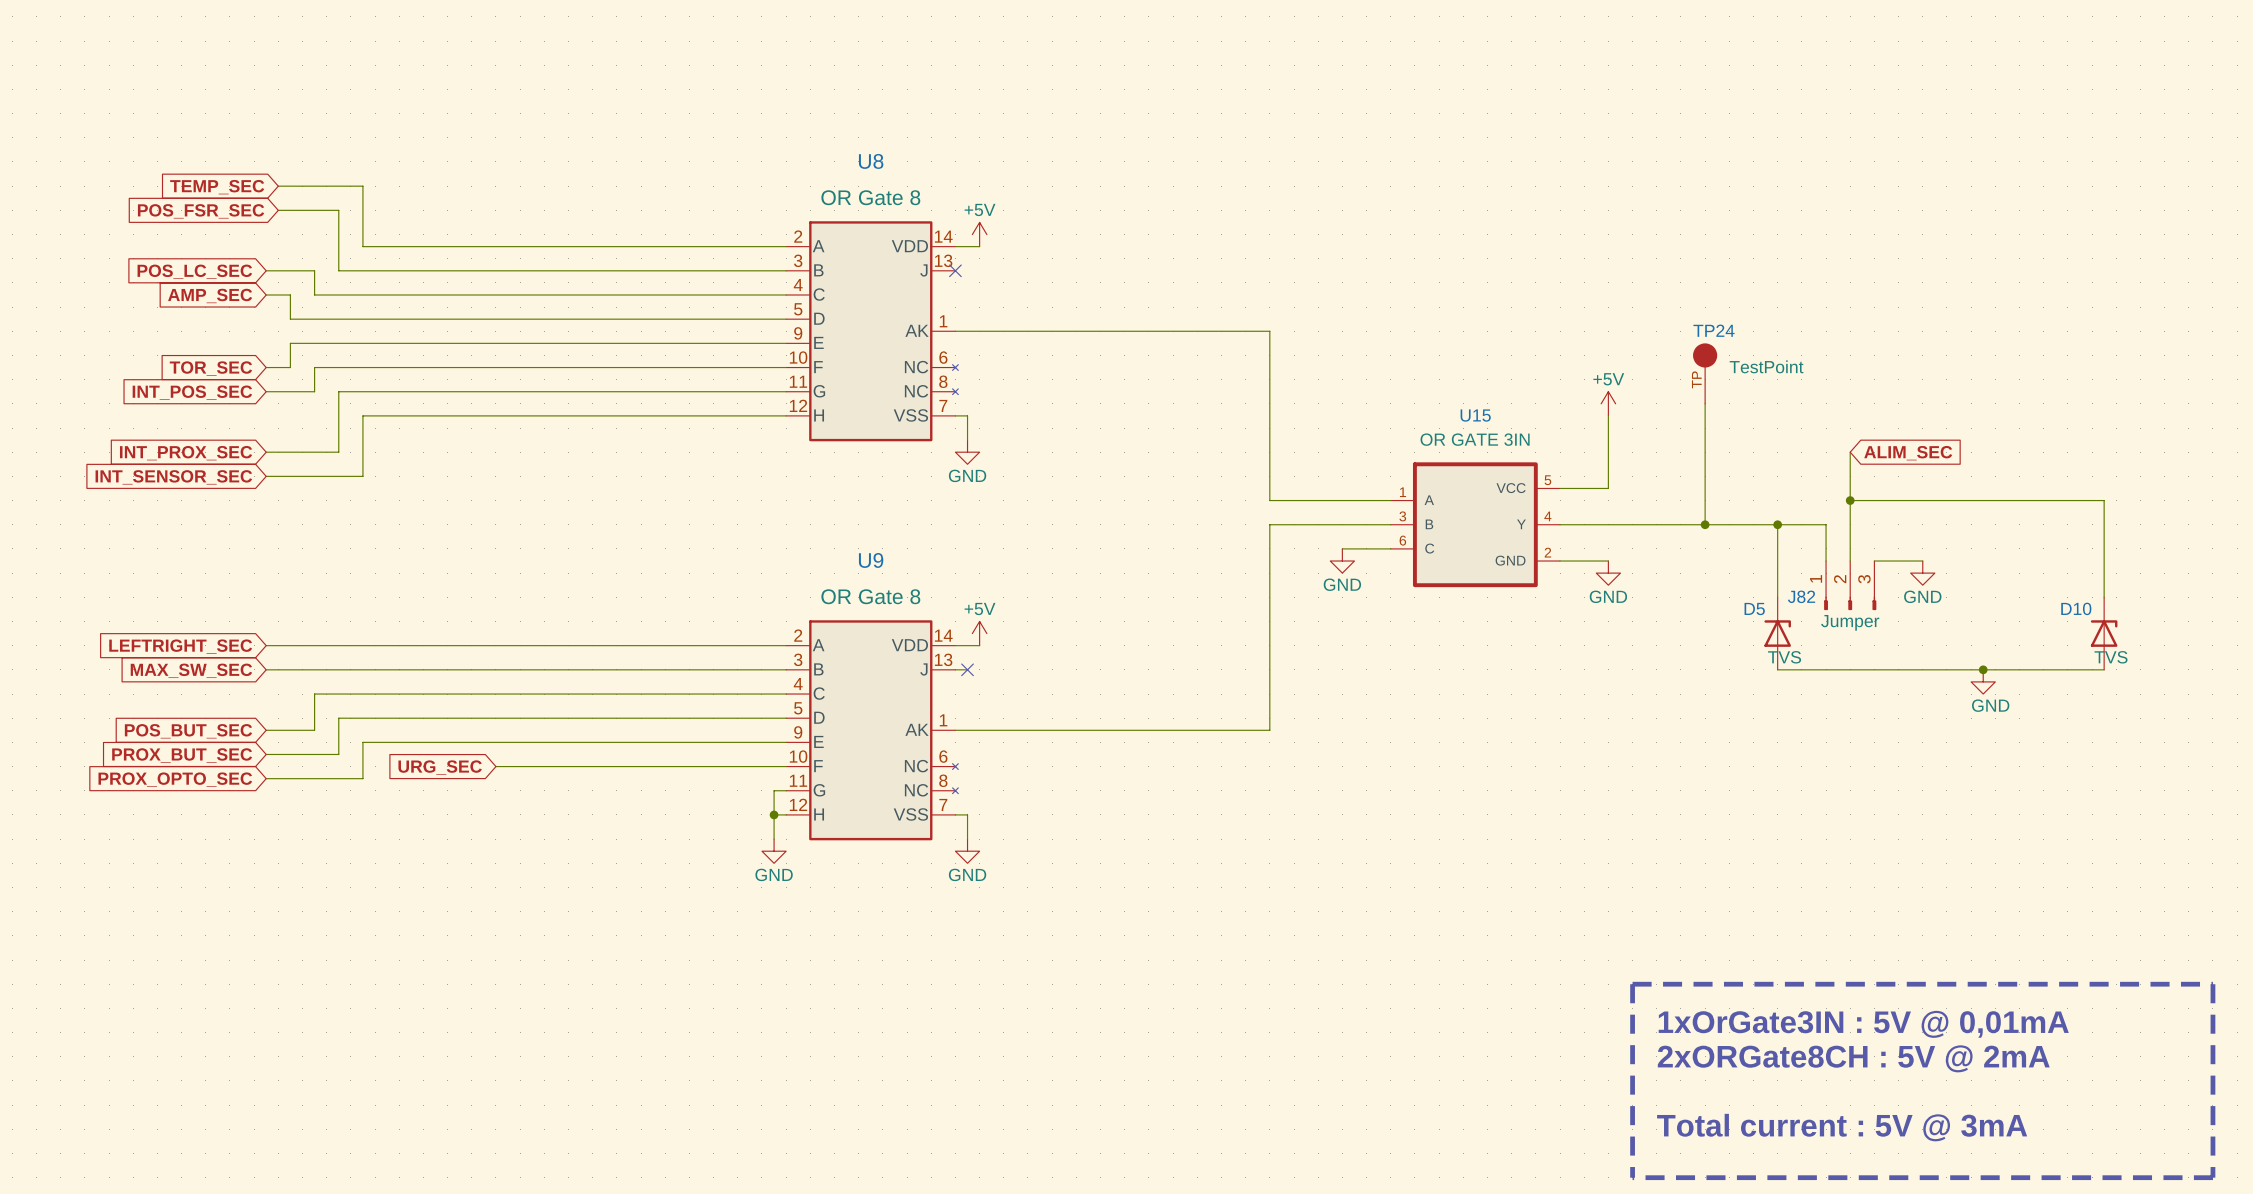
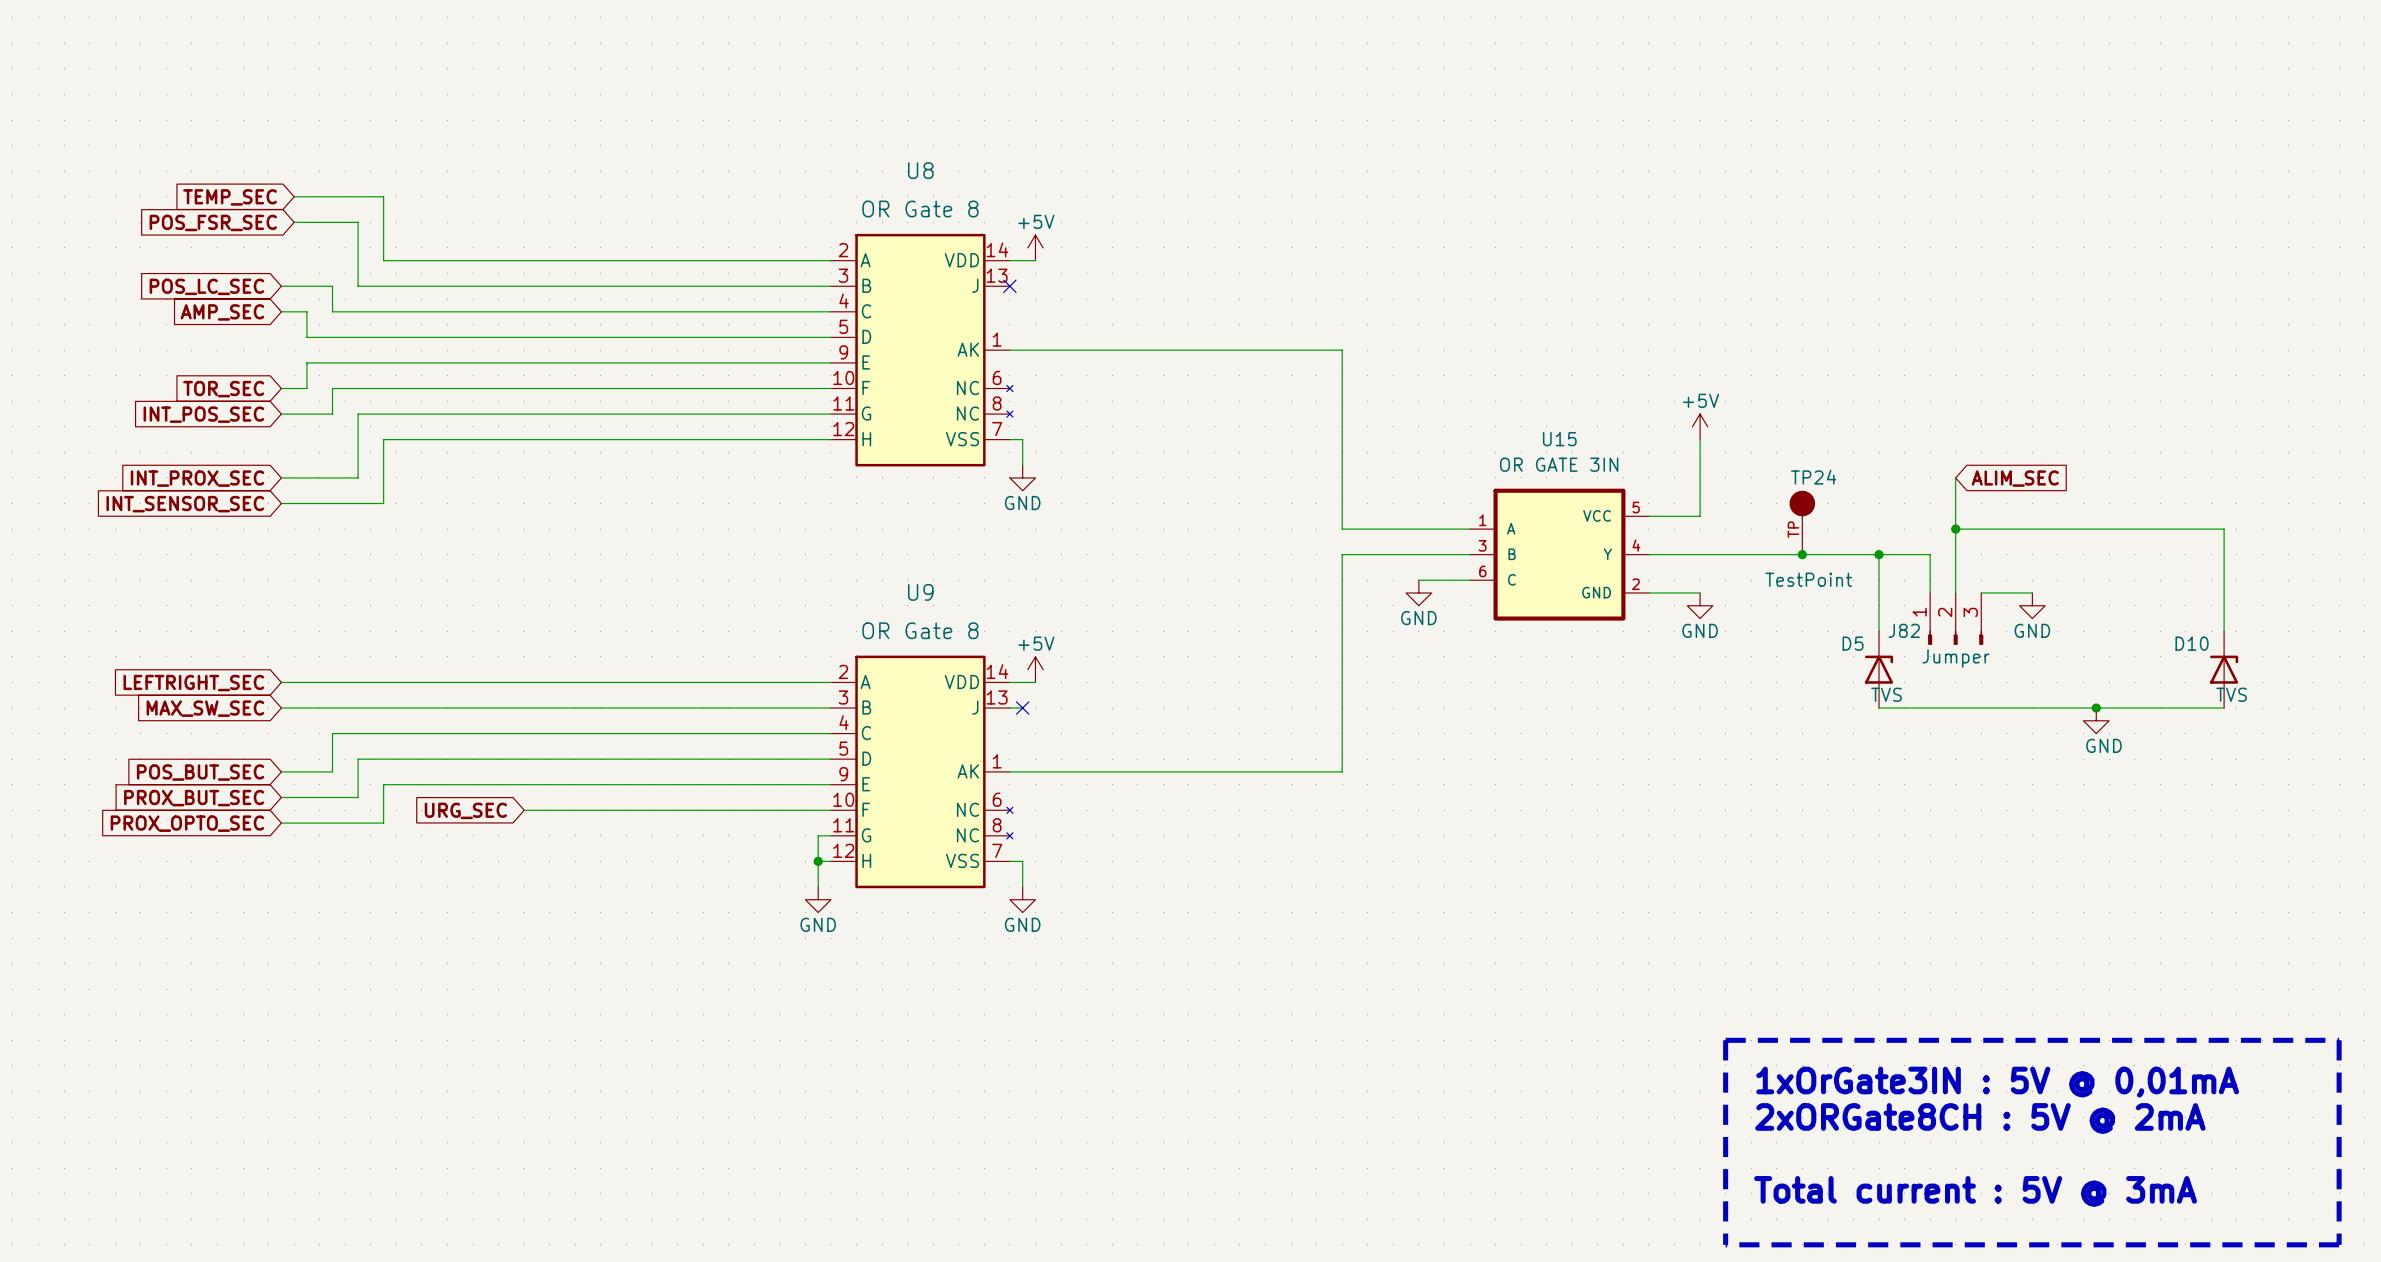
TP24 value position: TestPoint (1766, 366) -> TestPoint (1808, 579)
TP24 position: (1705, 373) -> (1802, 522)
wire: (1705, 403) (1705, 524) -> none

